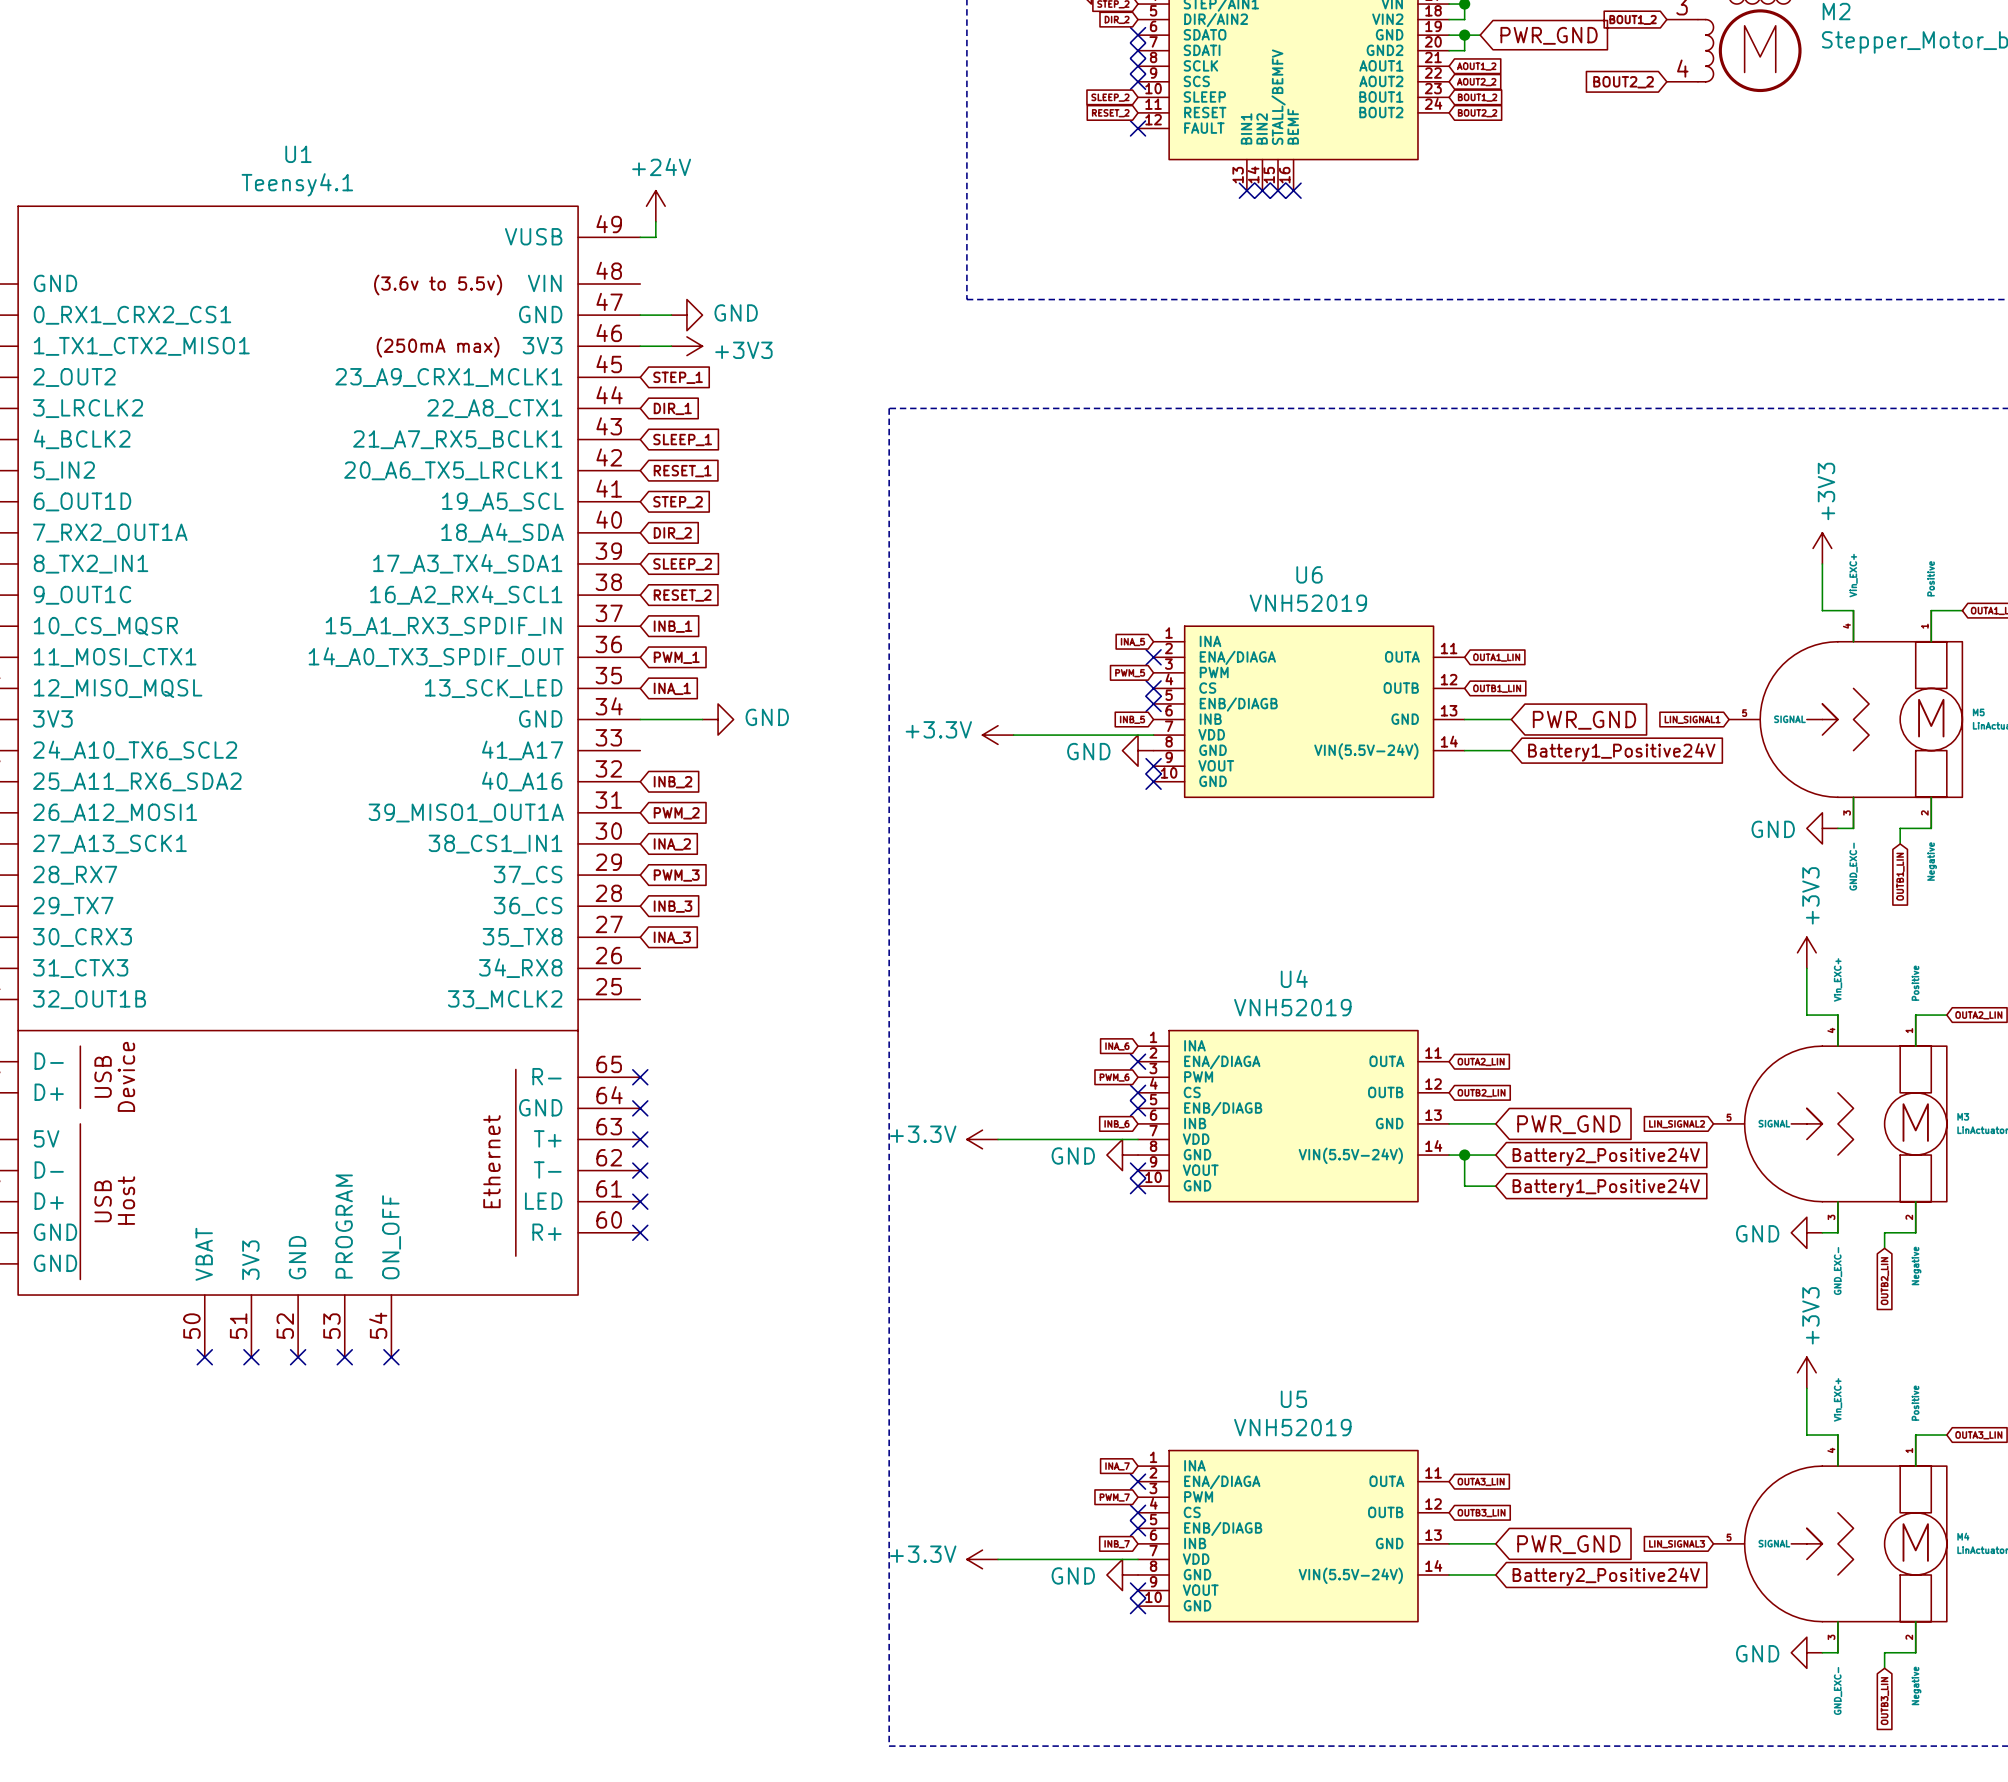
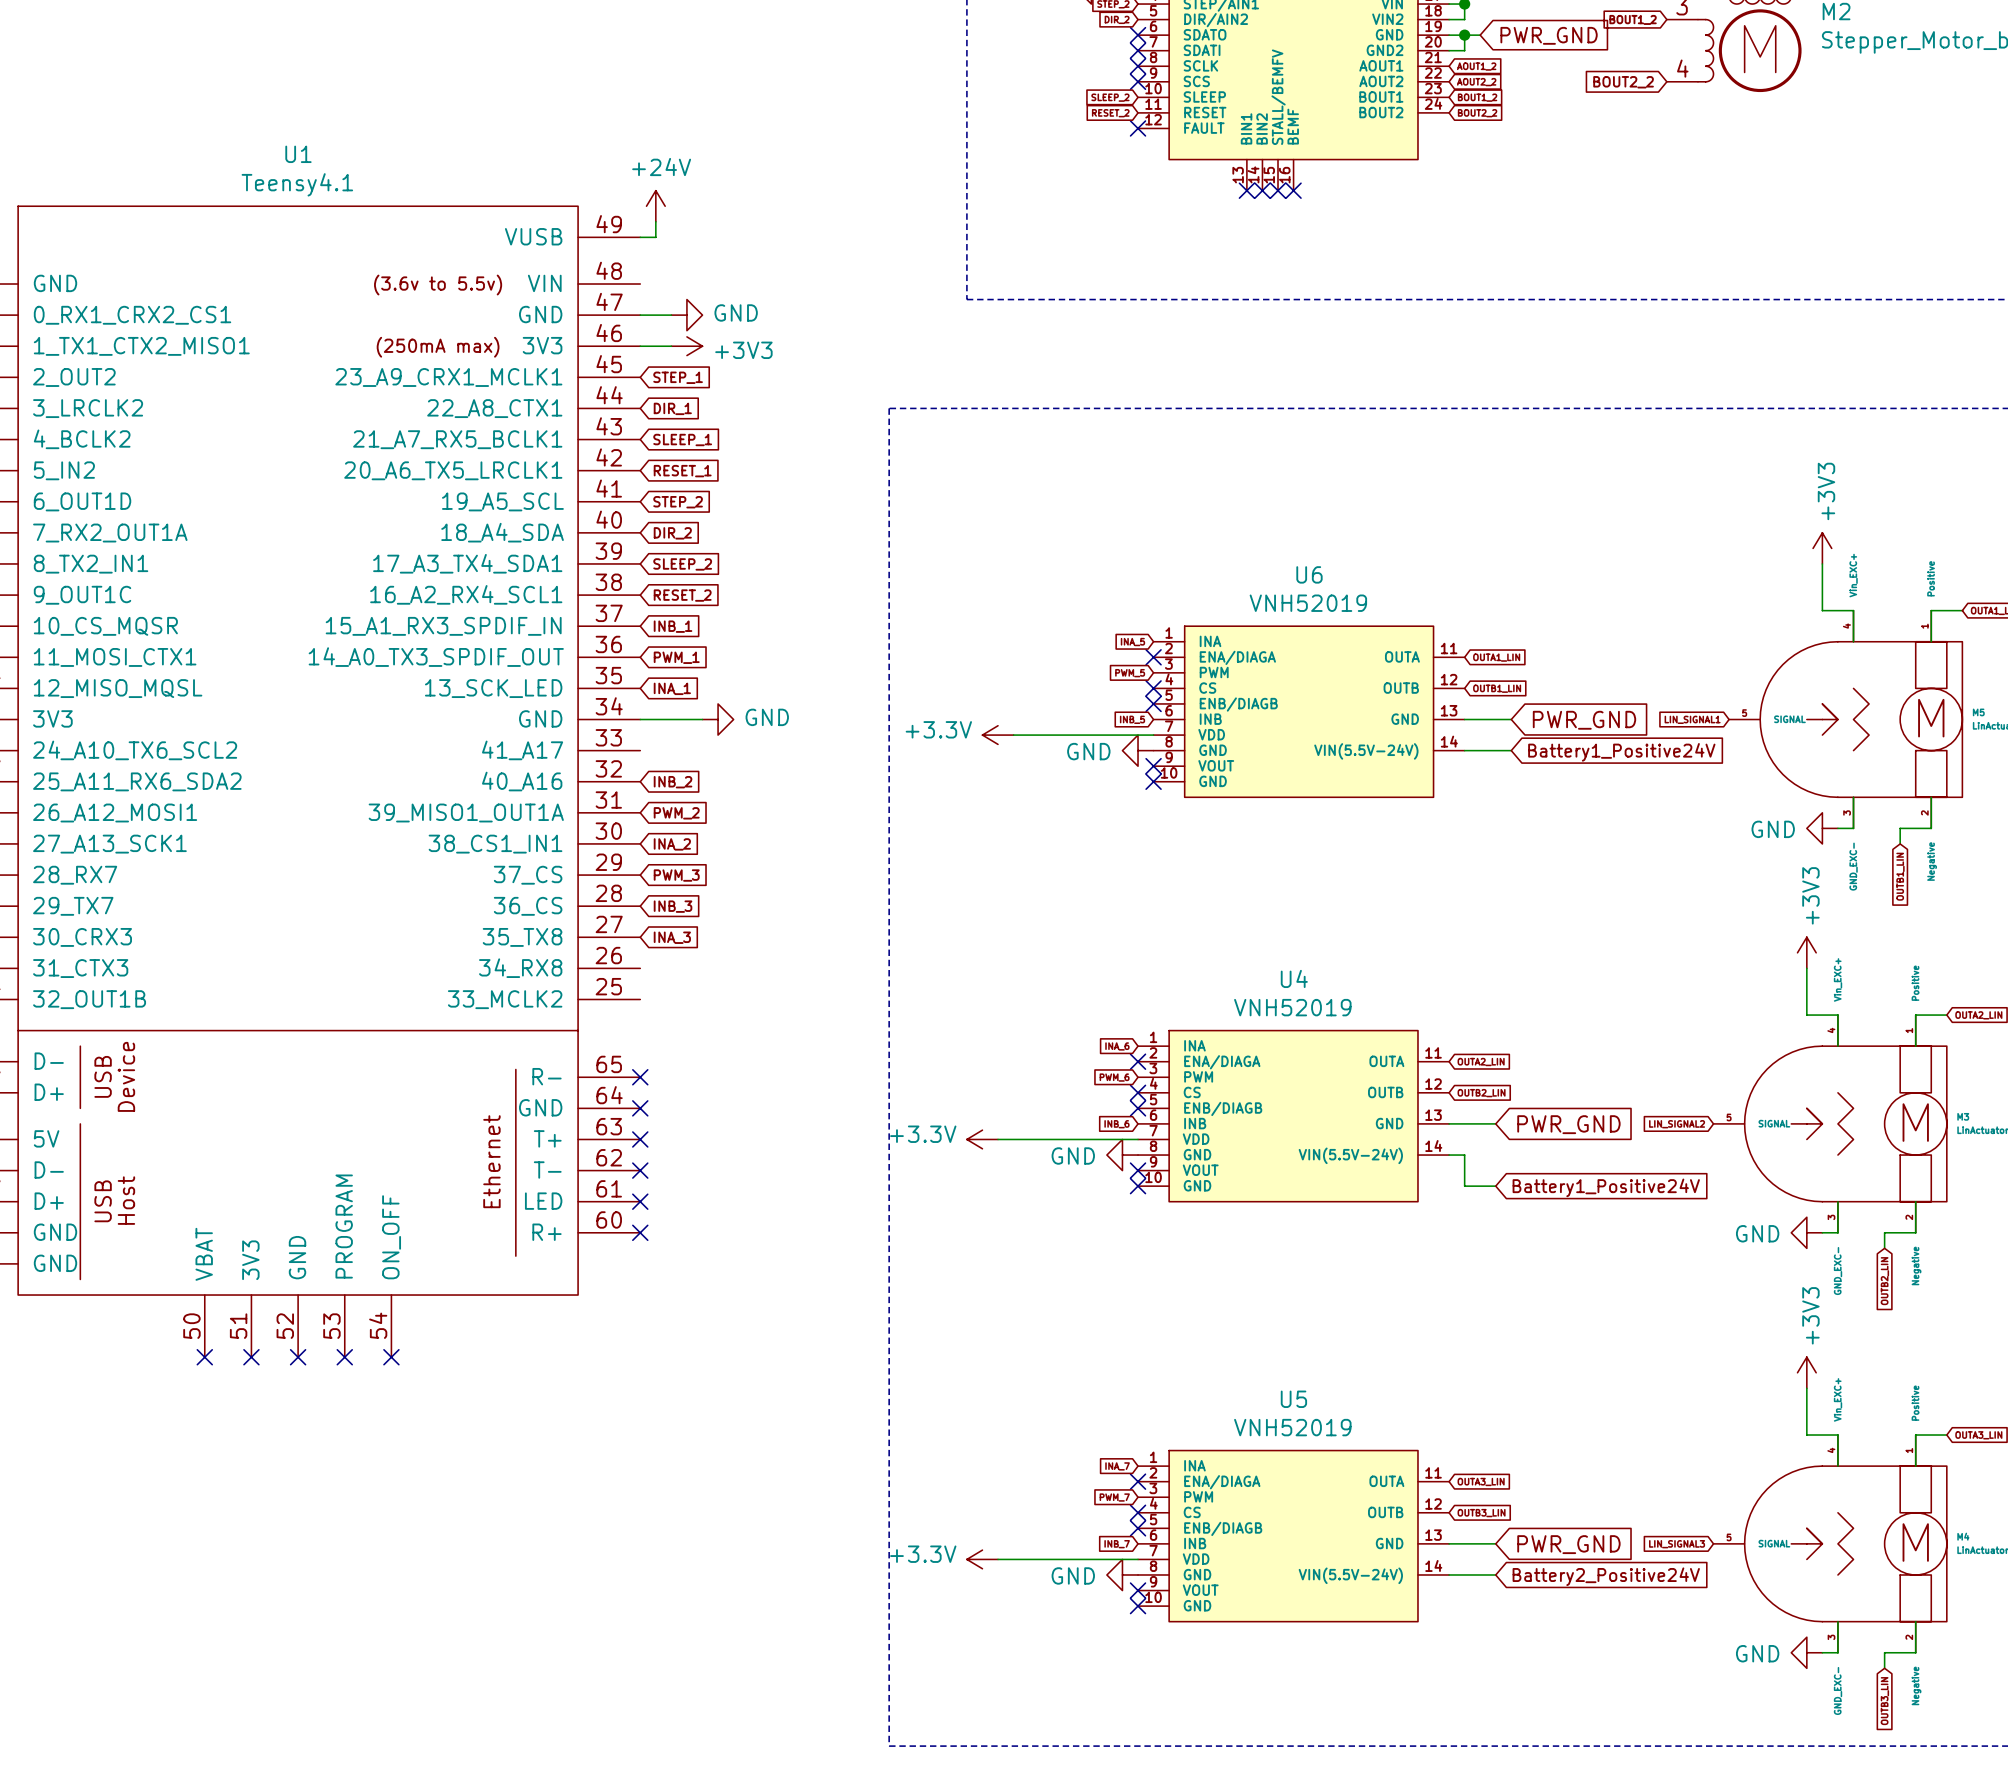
wire: (1464, 1155) (1495, 1155) -> none
junction: (1464, 1155) -> none
global label: Battery2_Positive24V (1606, 1156) -> none

